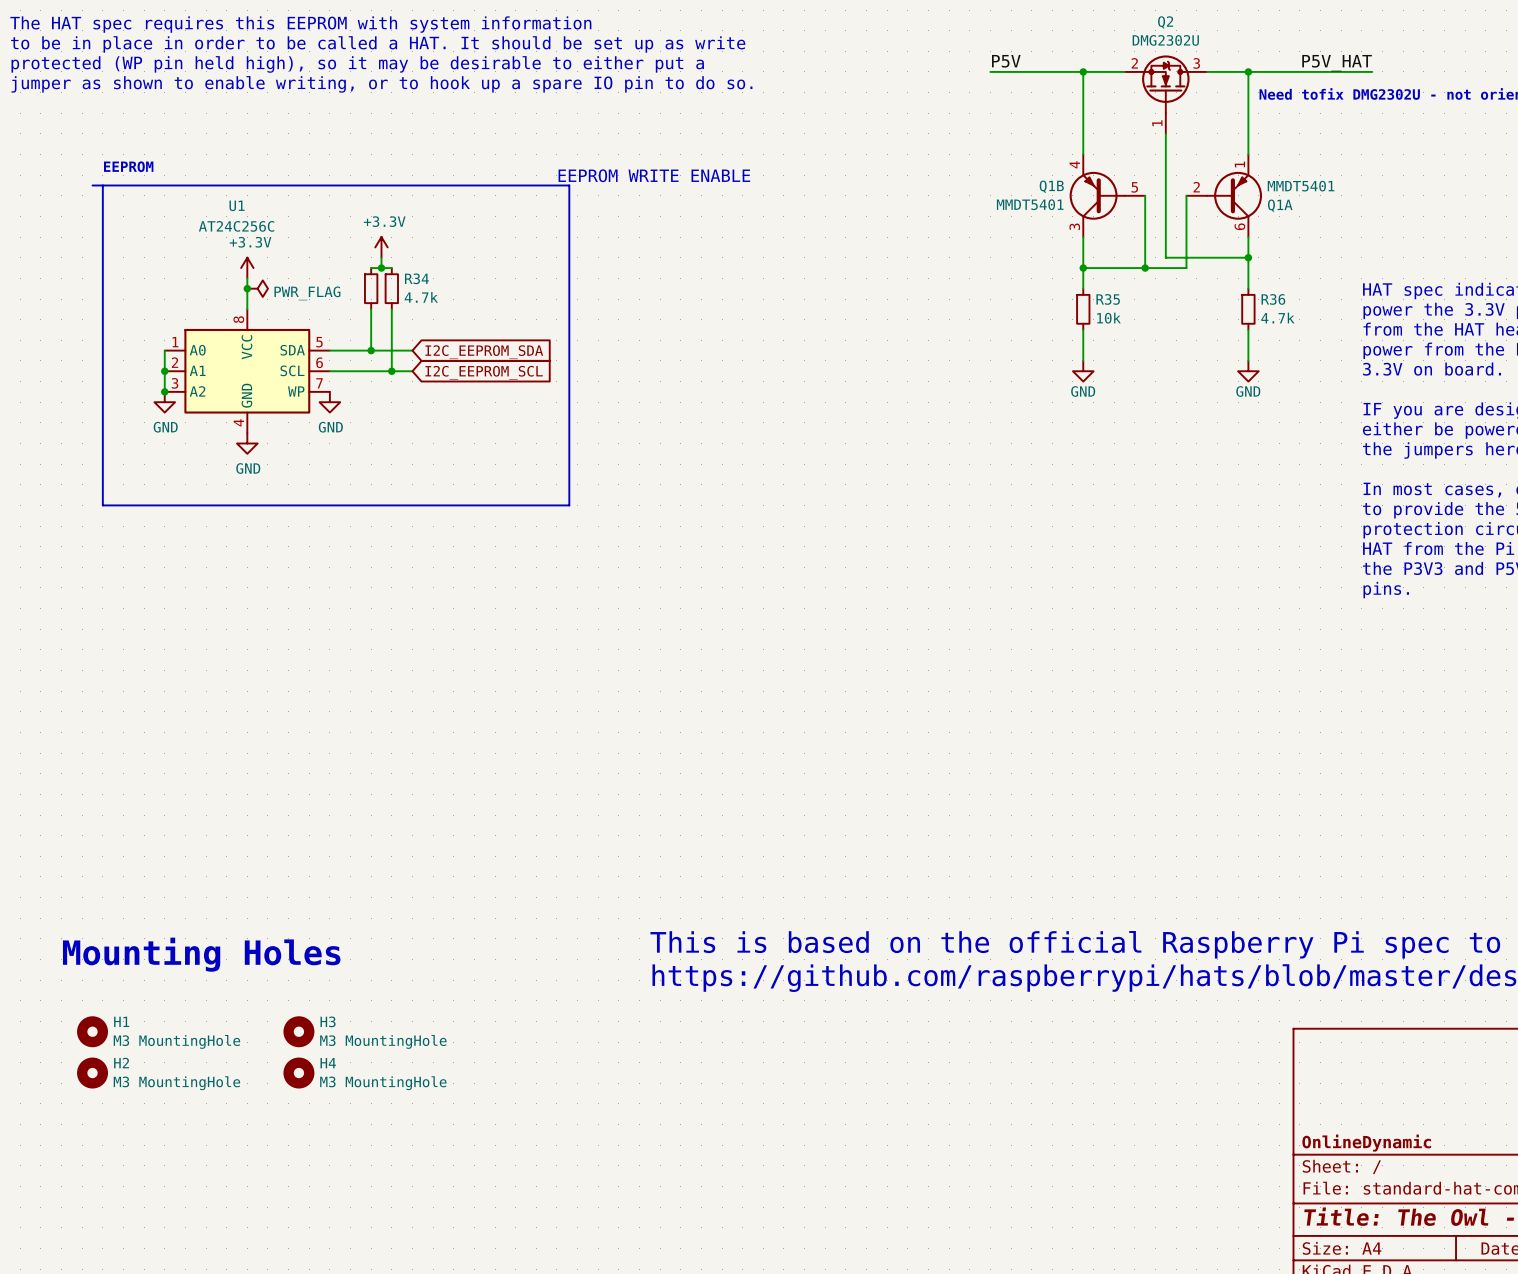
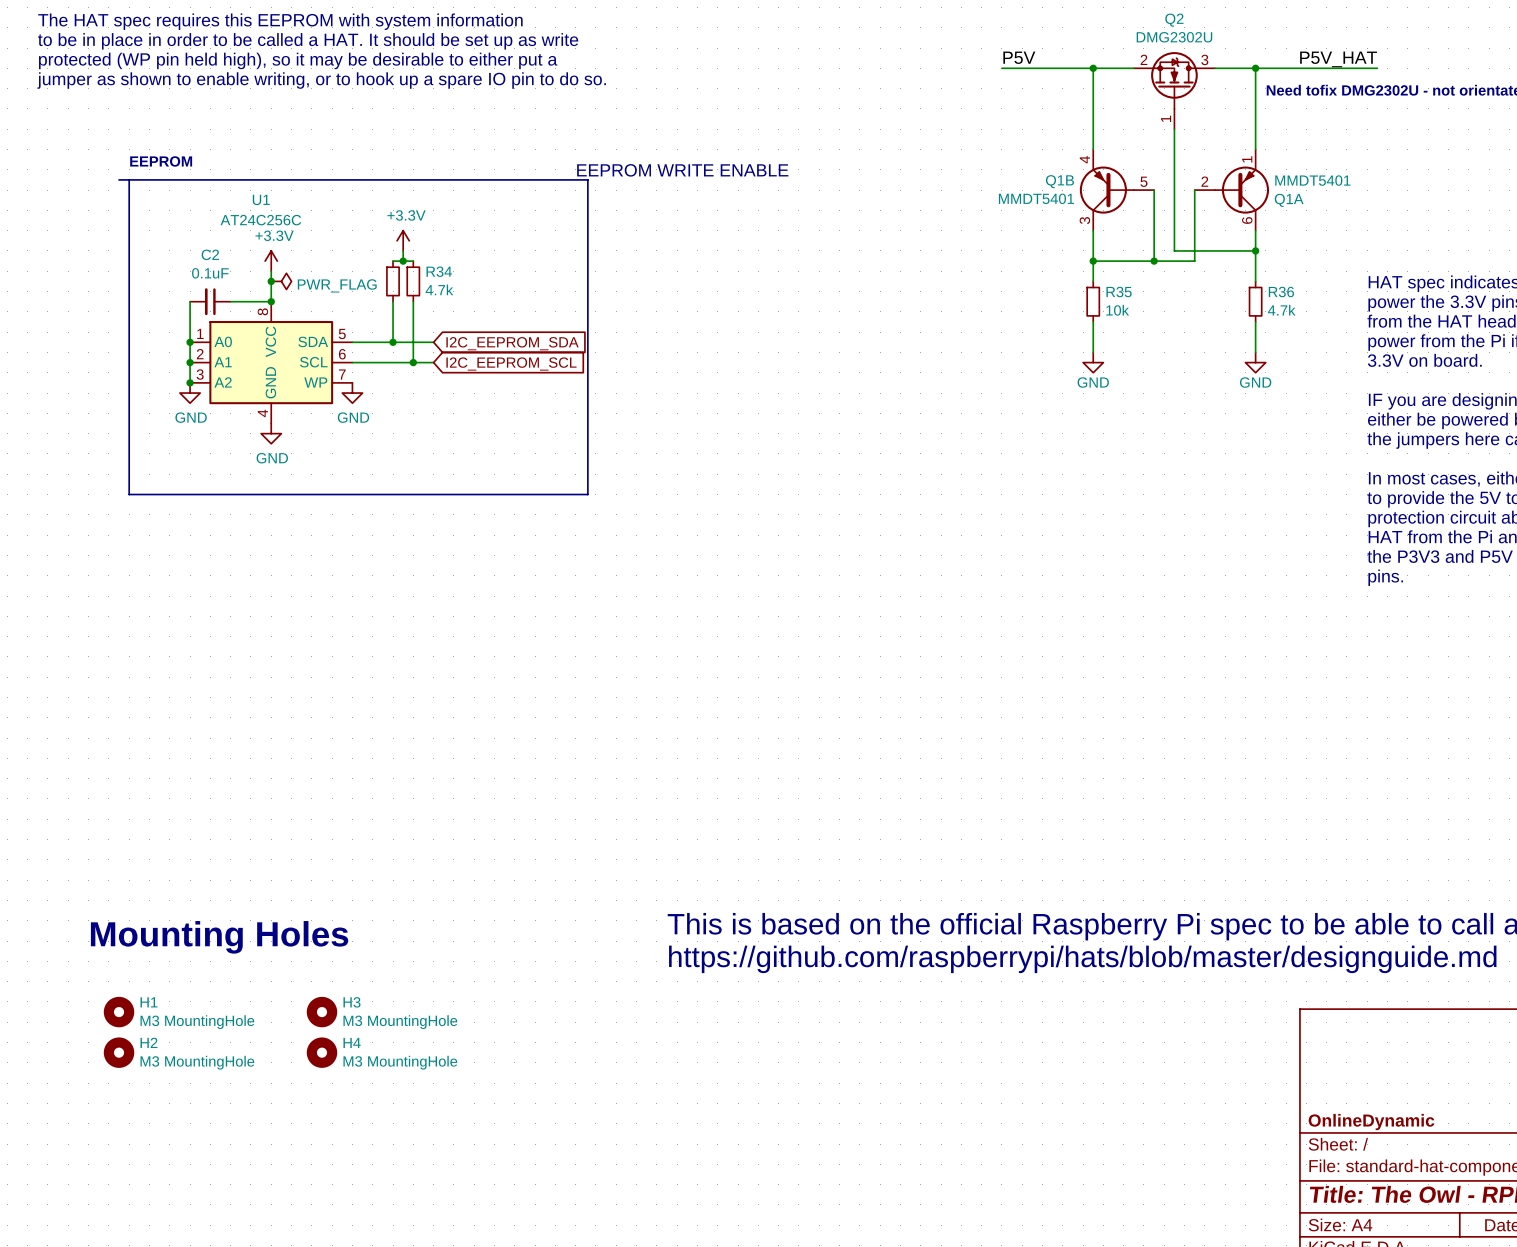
wire: none -> (190, 301) (190, 342)
C2: none -> 0.1uF (210, 301)
wire: none -> (230, 301) (271, 301)
junction: none -> (271, 301)
junction: none -> (190, 342)

